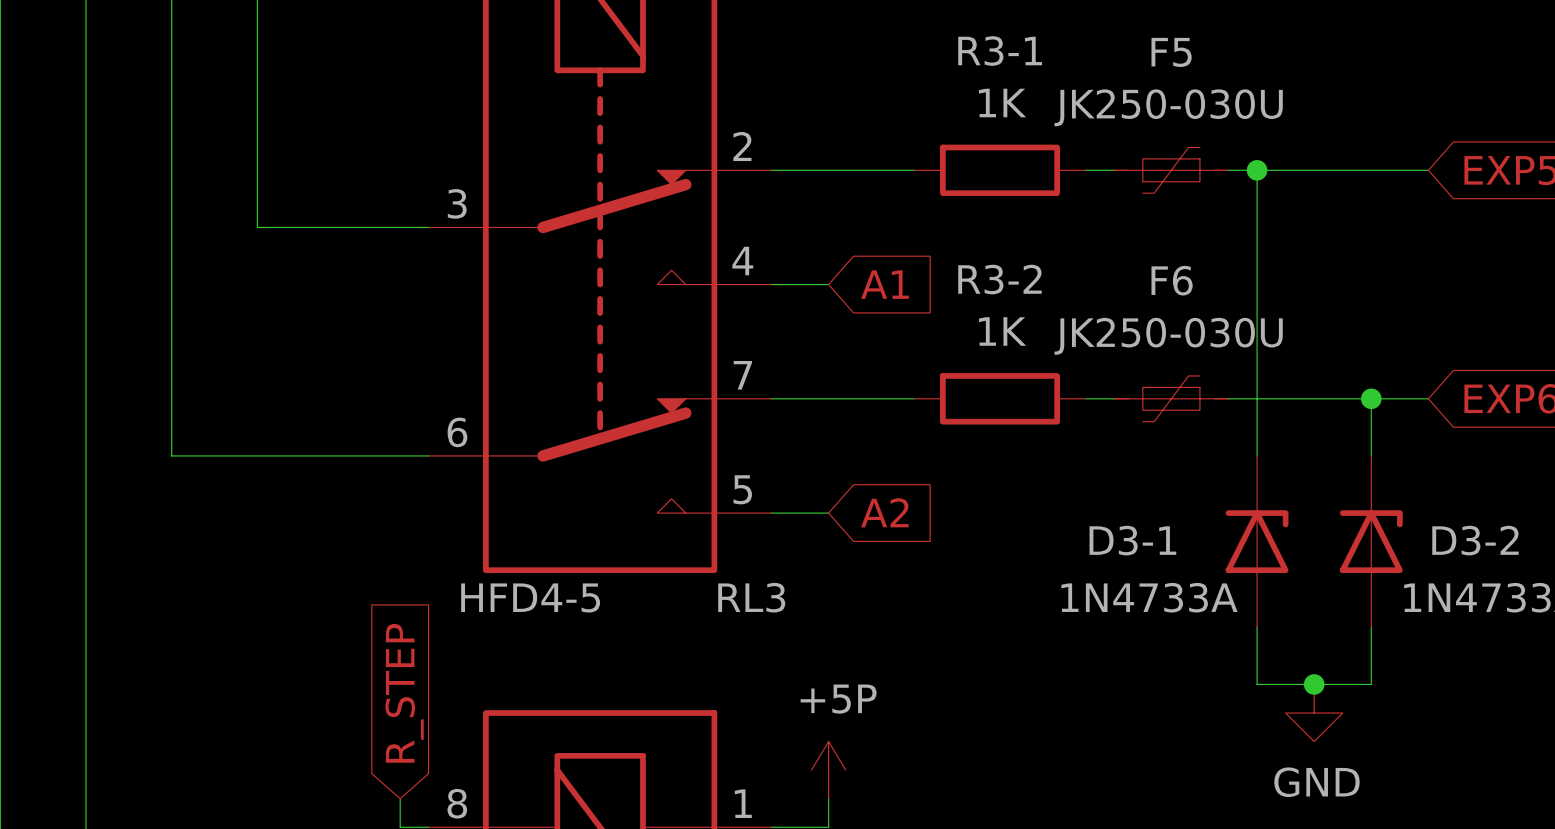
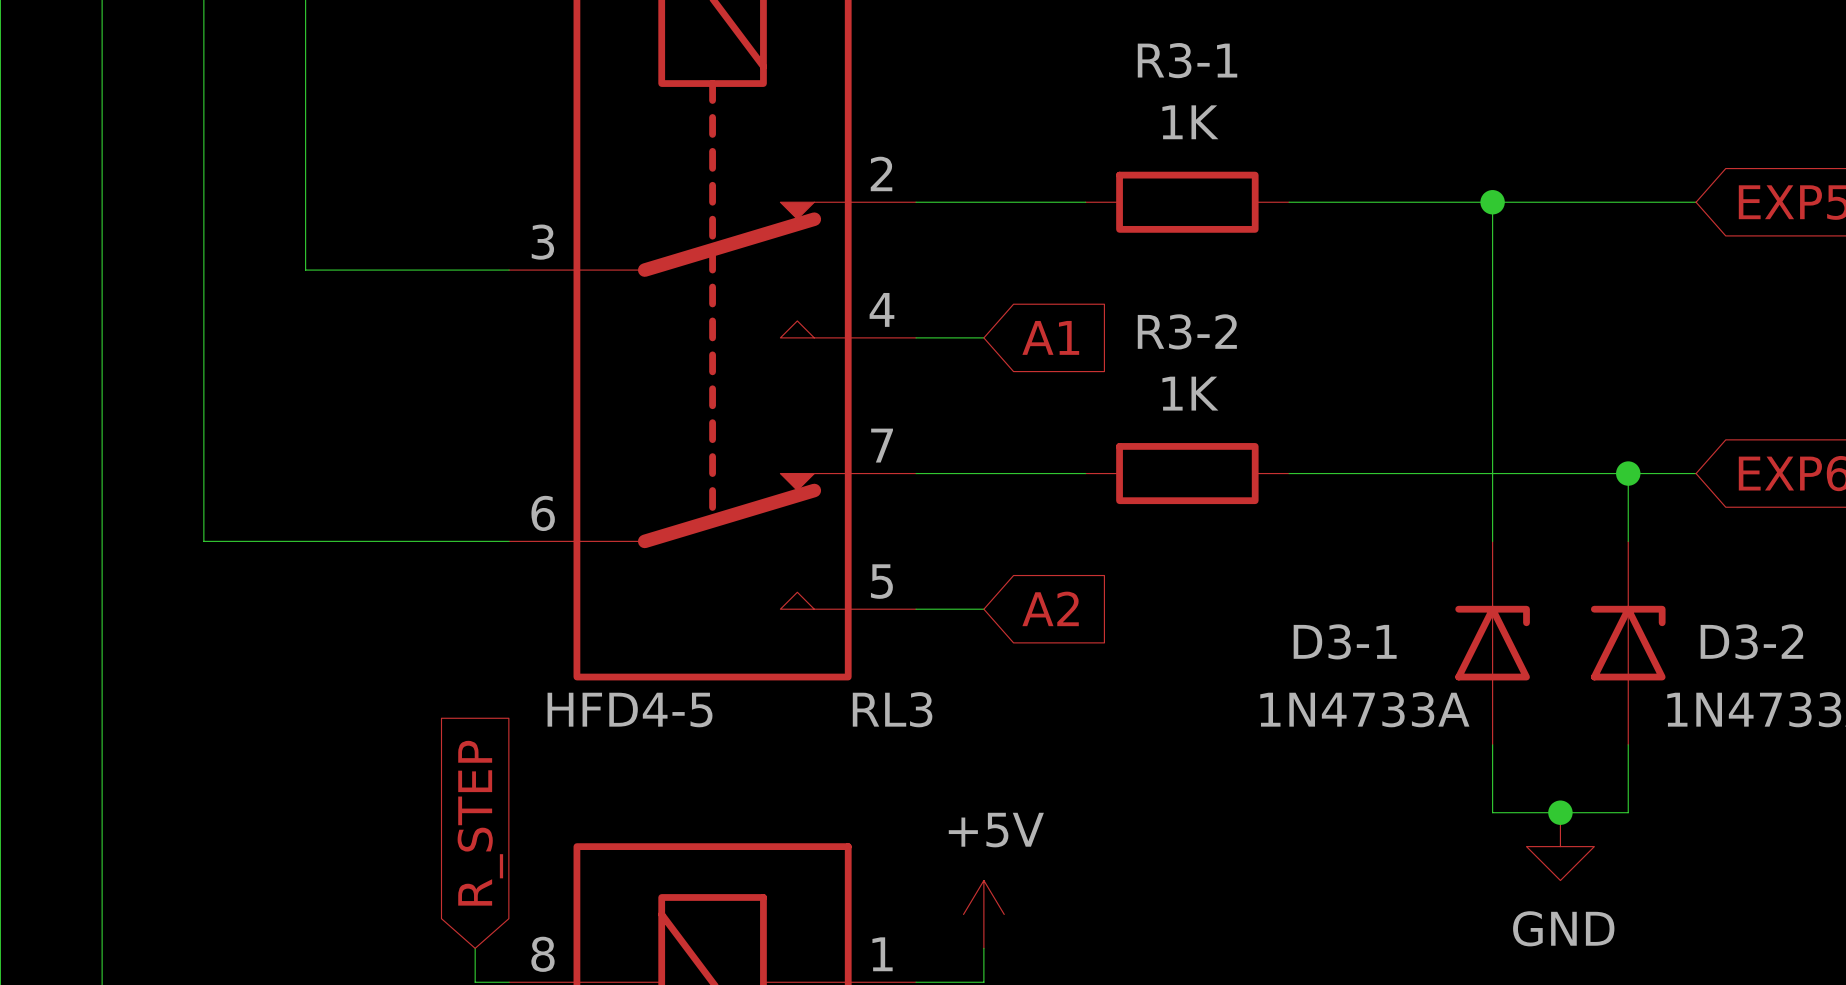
F5: JK250-030U (1171, 170) -> none
F6: JK250-030U (1171, 398) -> none
power symbol: +5P (828, 770) -> +5V (983, 914)

